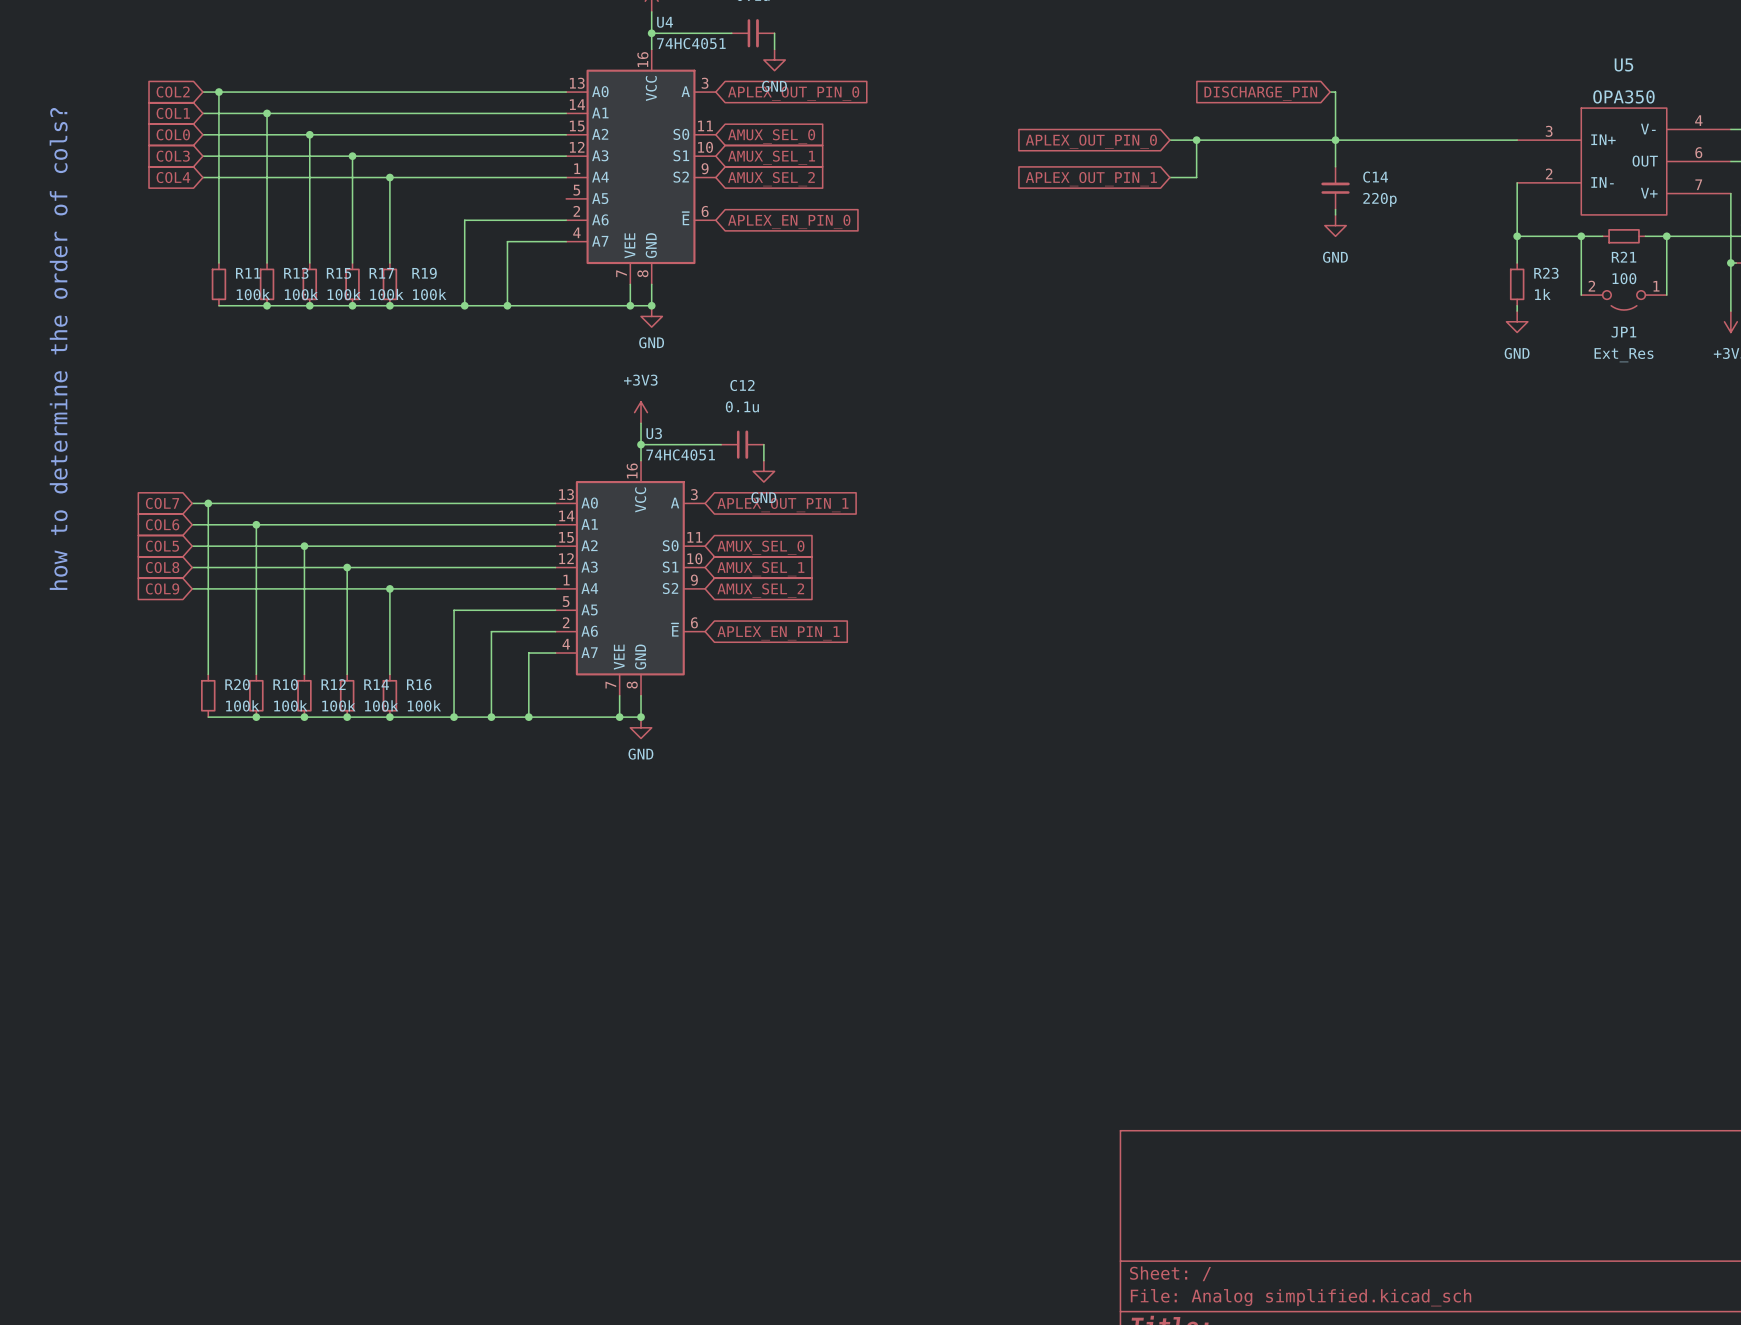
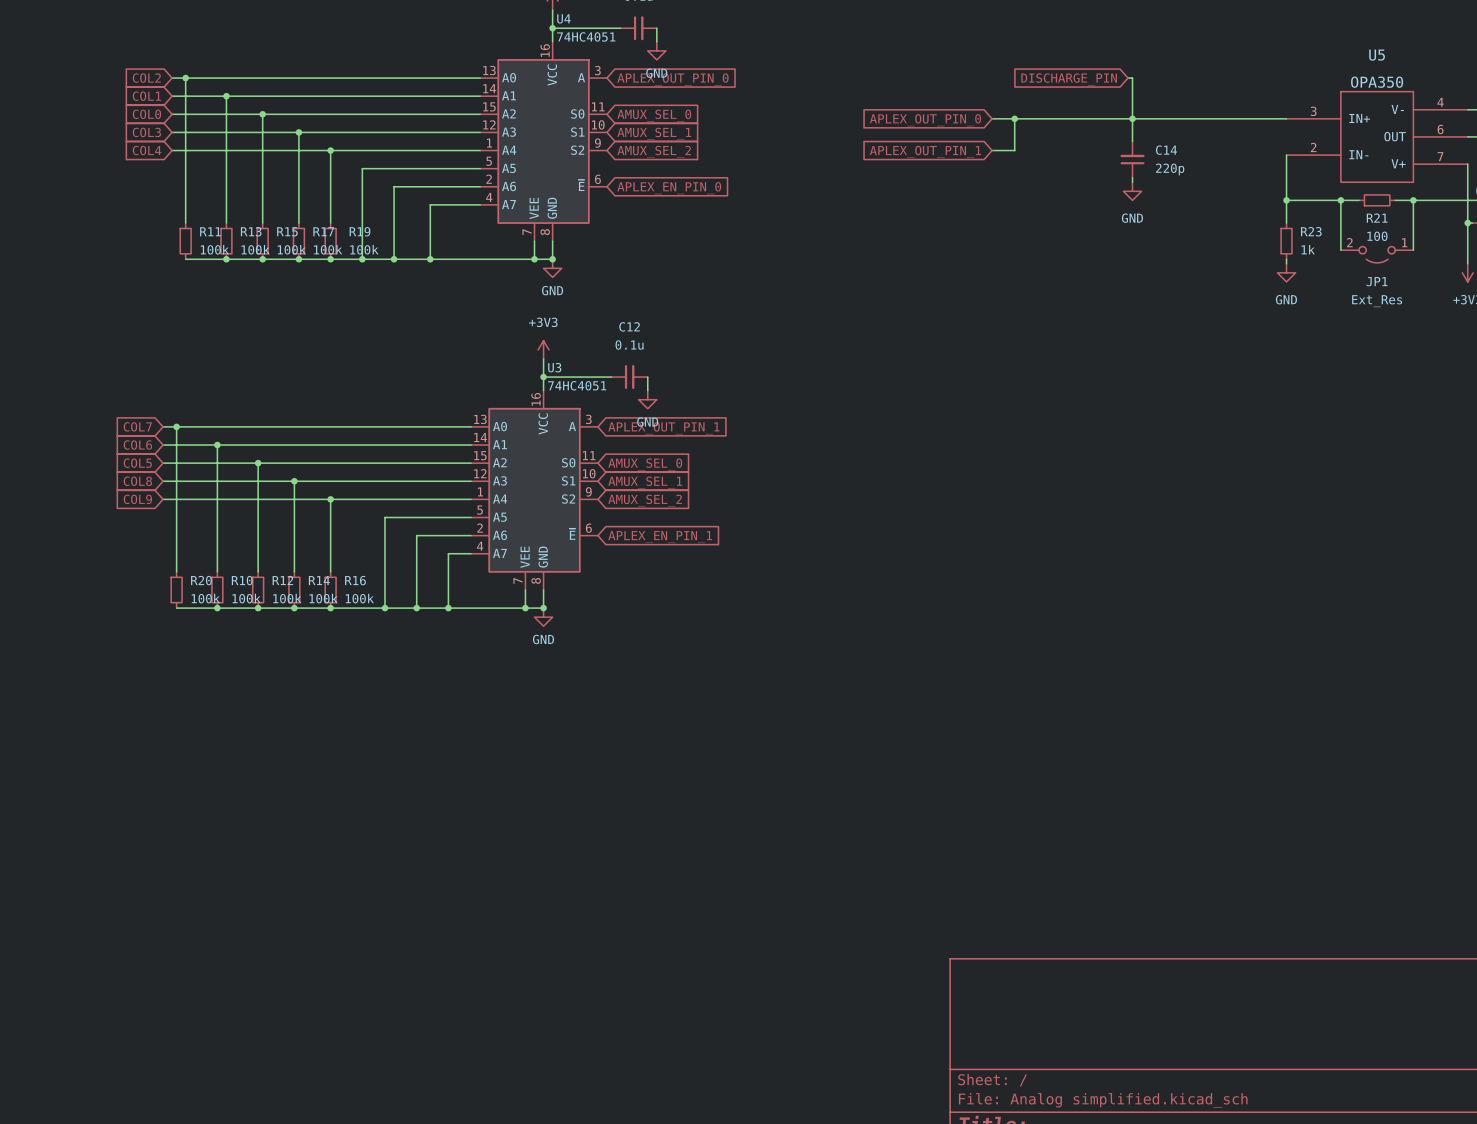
wire: none -> (480, 168) (362, 168) (362, 259)
junction: none -> (362, 259)
text: how to determine the order of cols? (58, 348) -> none

